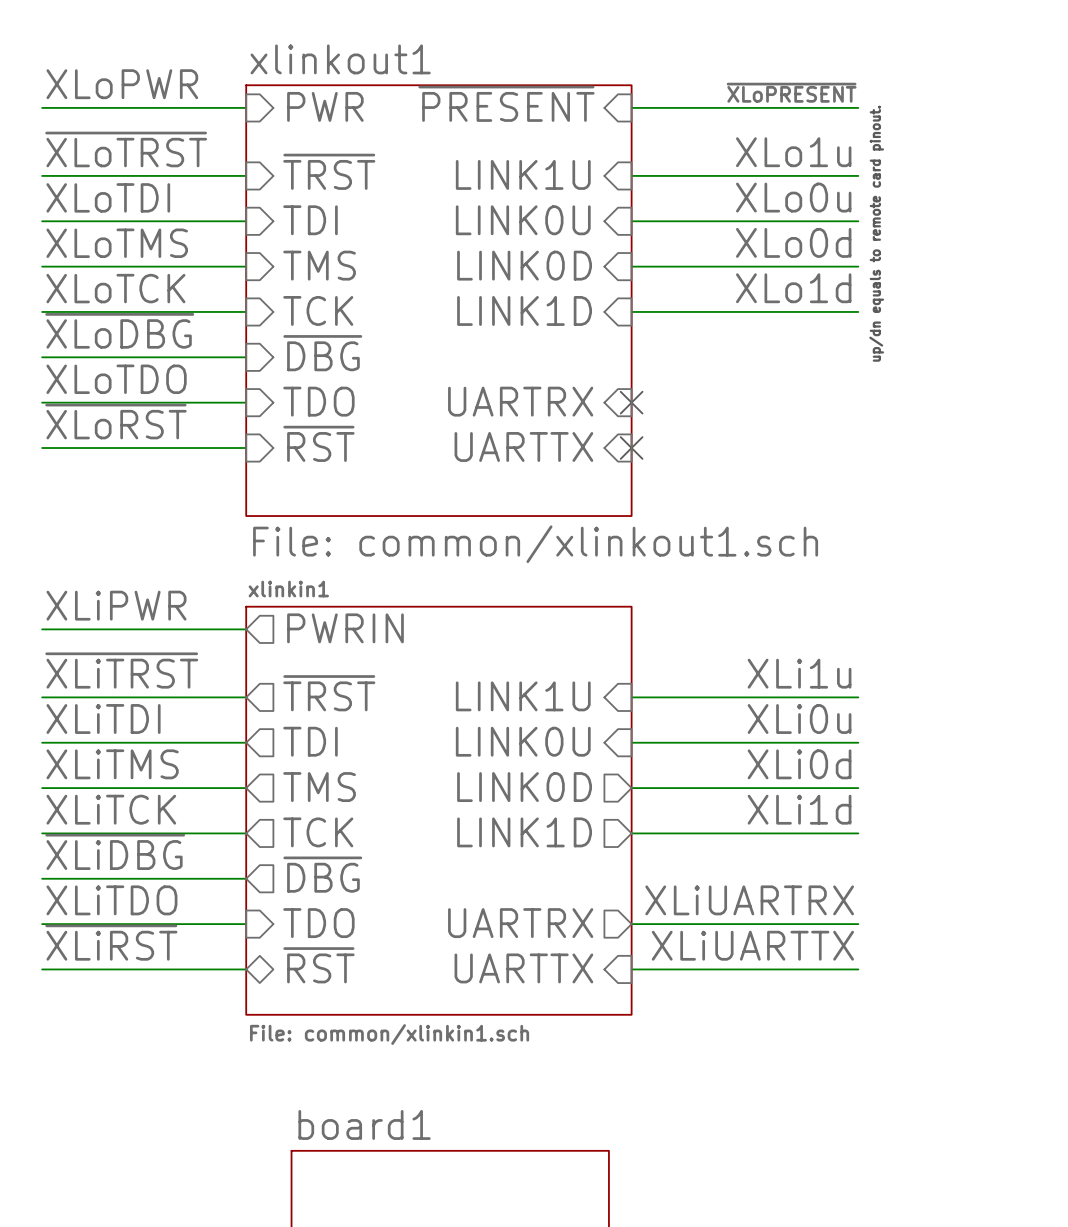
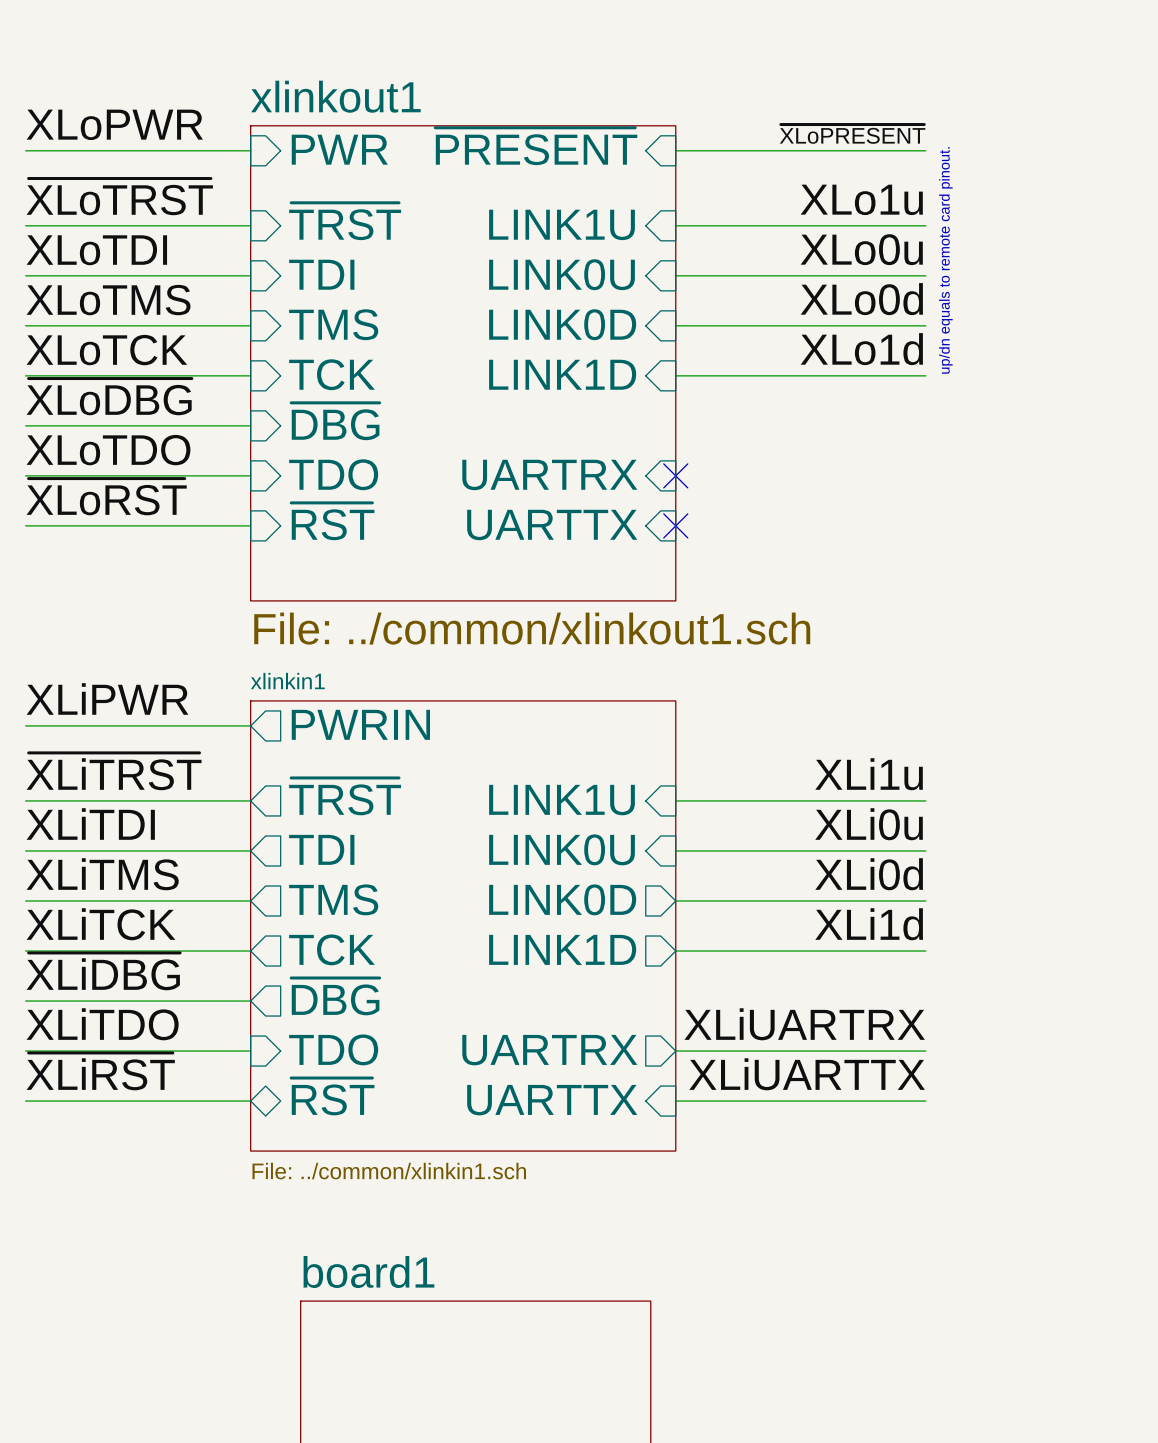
sheet xlinkout1 value: File: common/xlinkout1.sch (535, 544) -> File: ../common/xlinkout1.sch (532, 628)
sheet xlinkin1 value: File: common/xlinkin1.sch (389, 1034) -> File: ../common/xlinkin1.sch (389, 1171)

